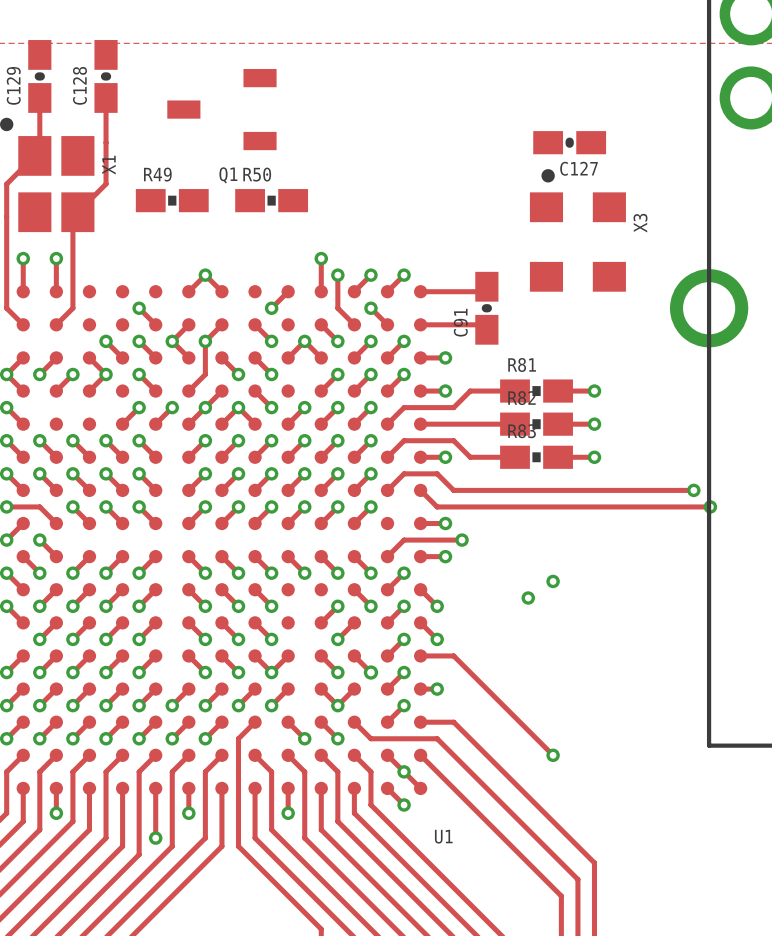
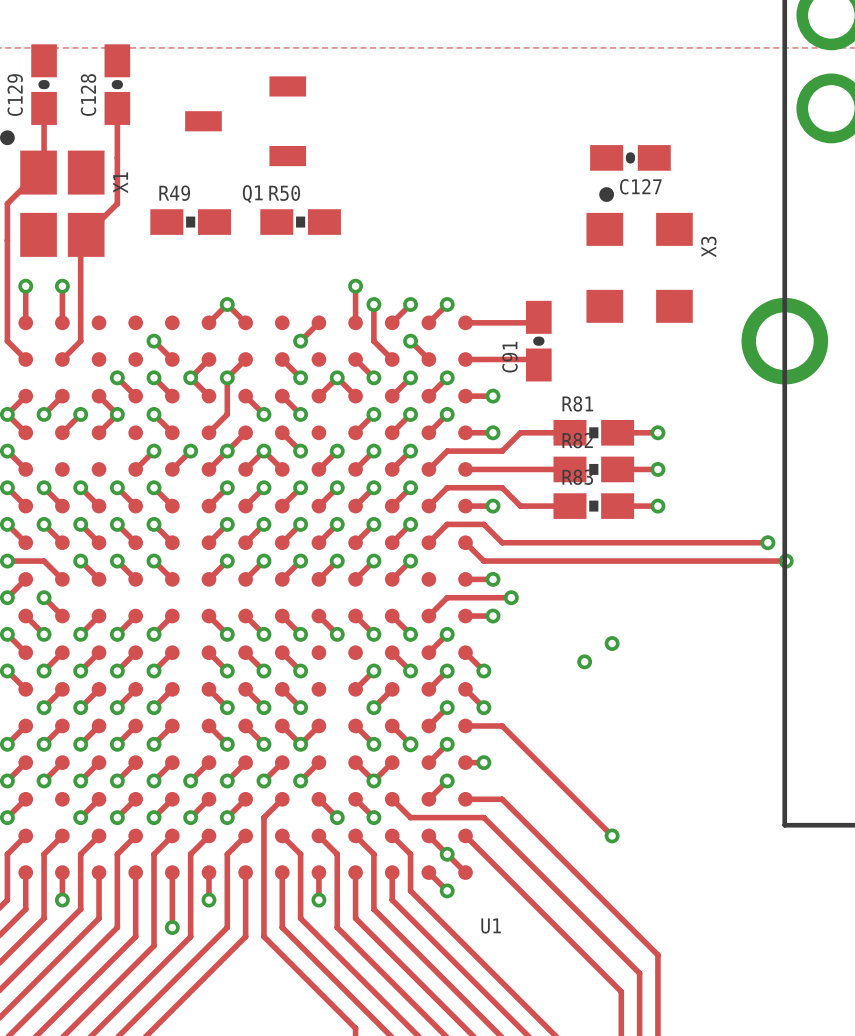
track: (56, 722) (39, 738) -> none
via: (39, 738) -> none

